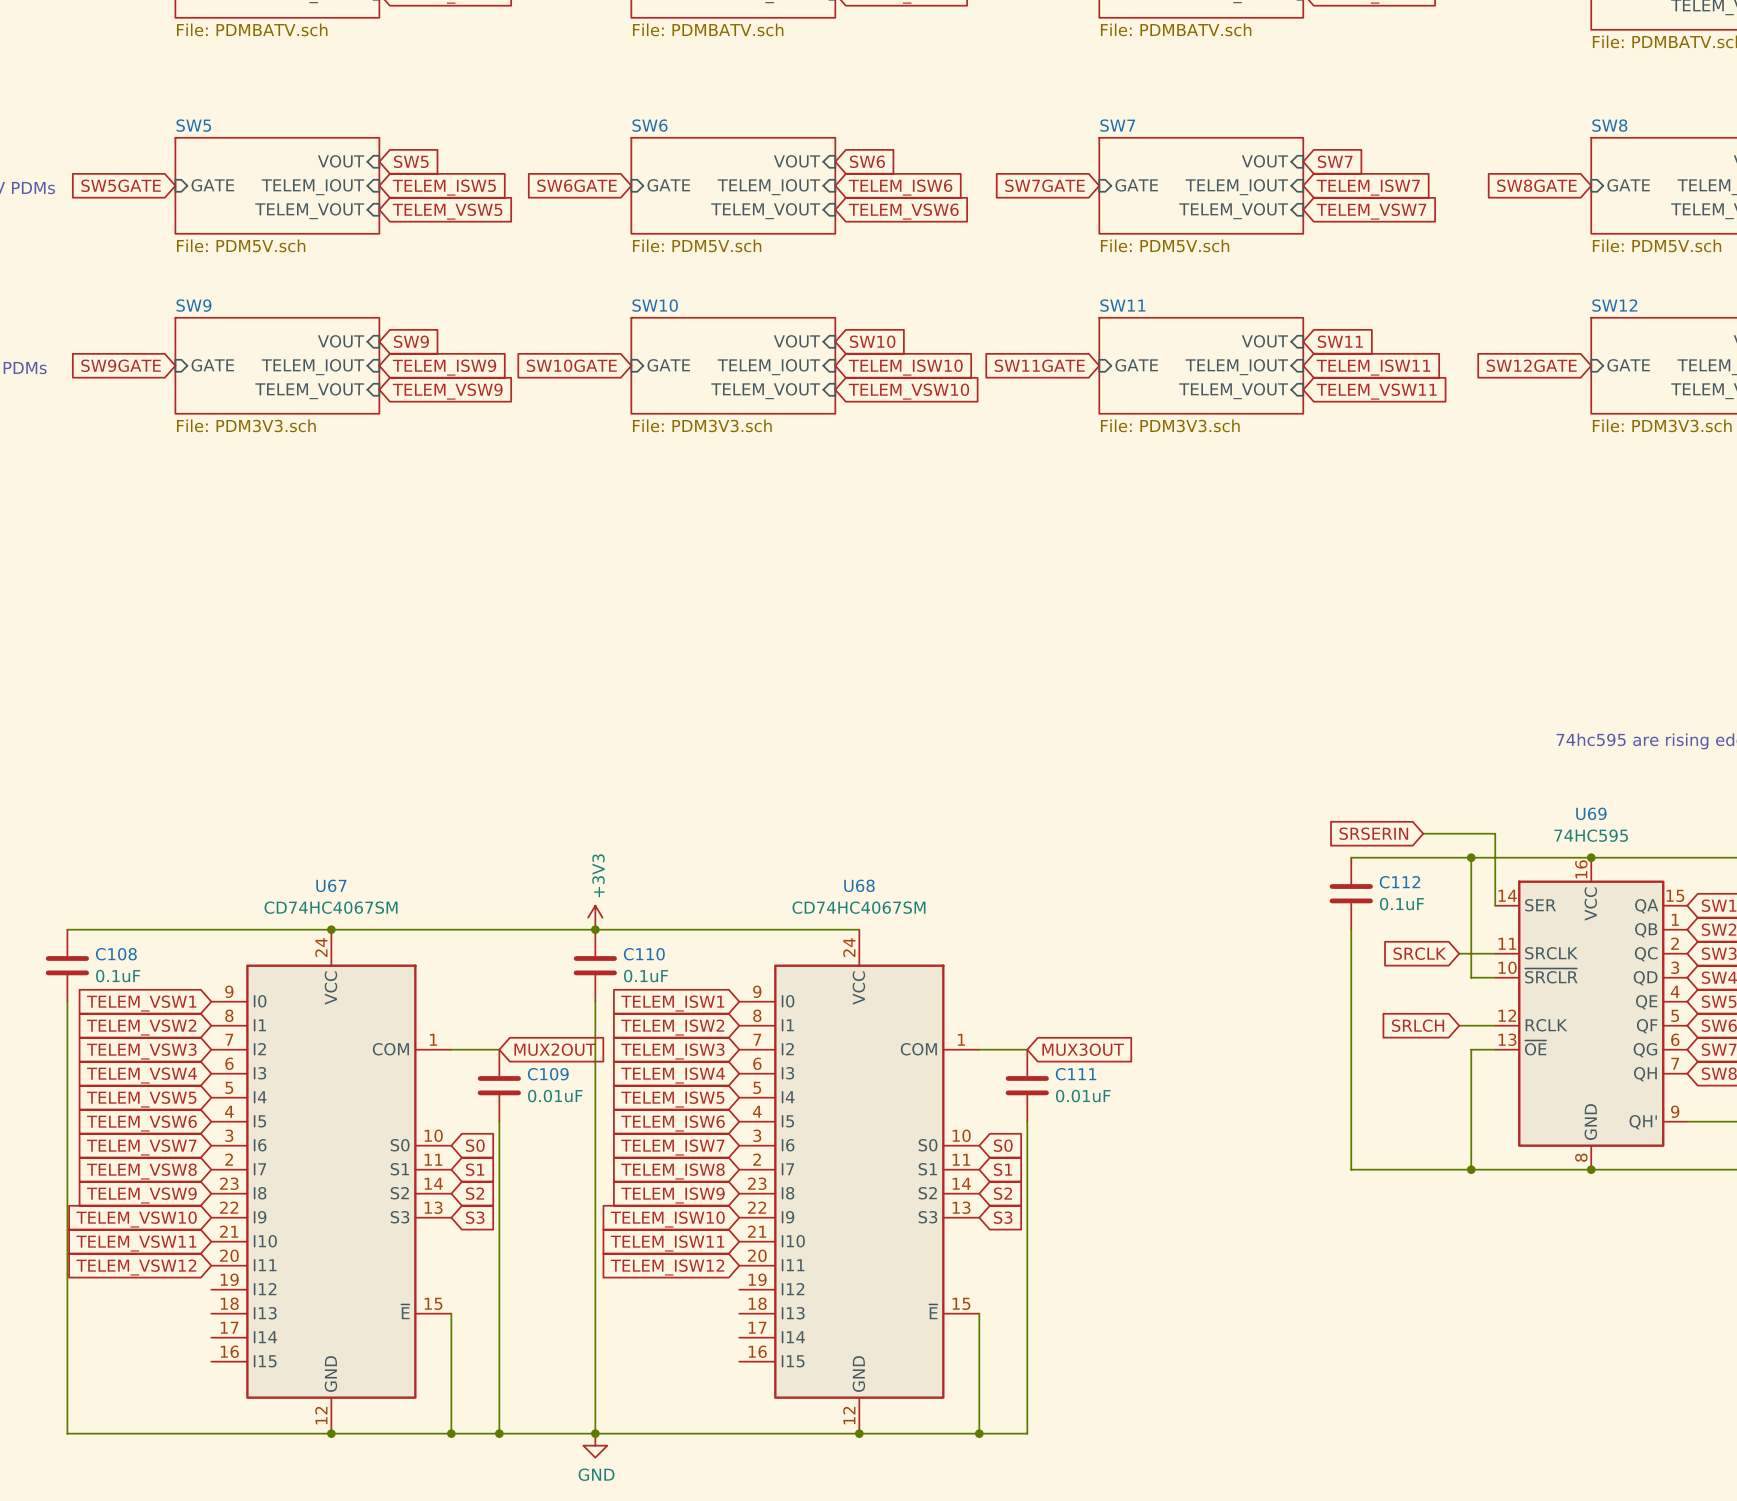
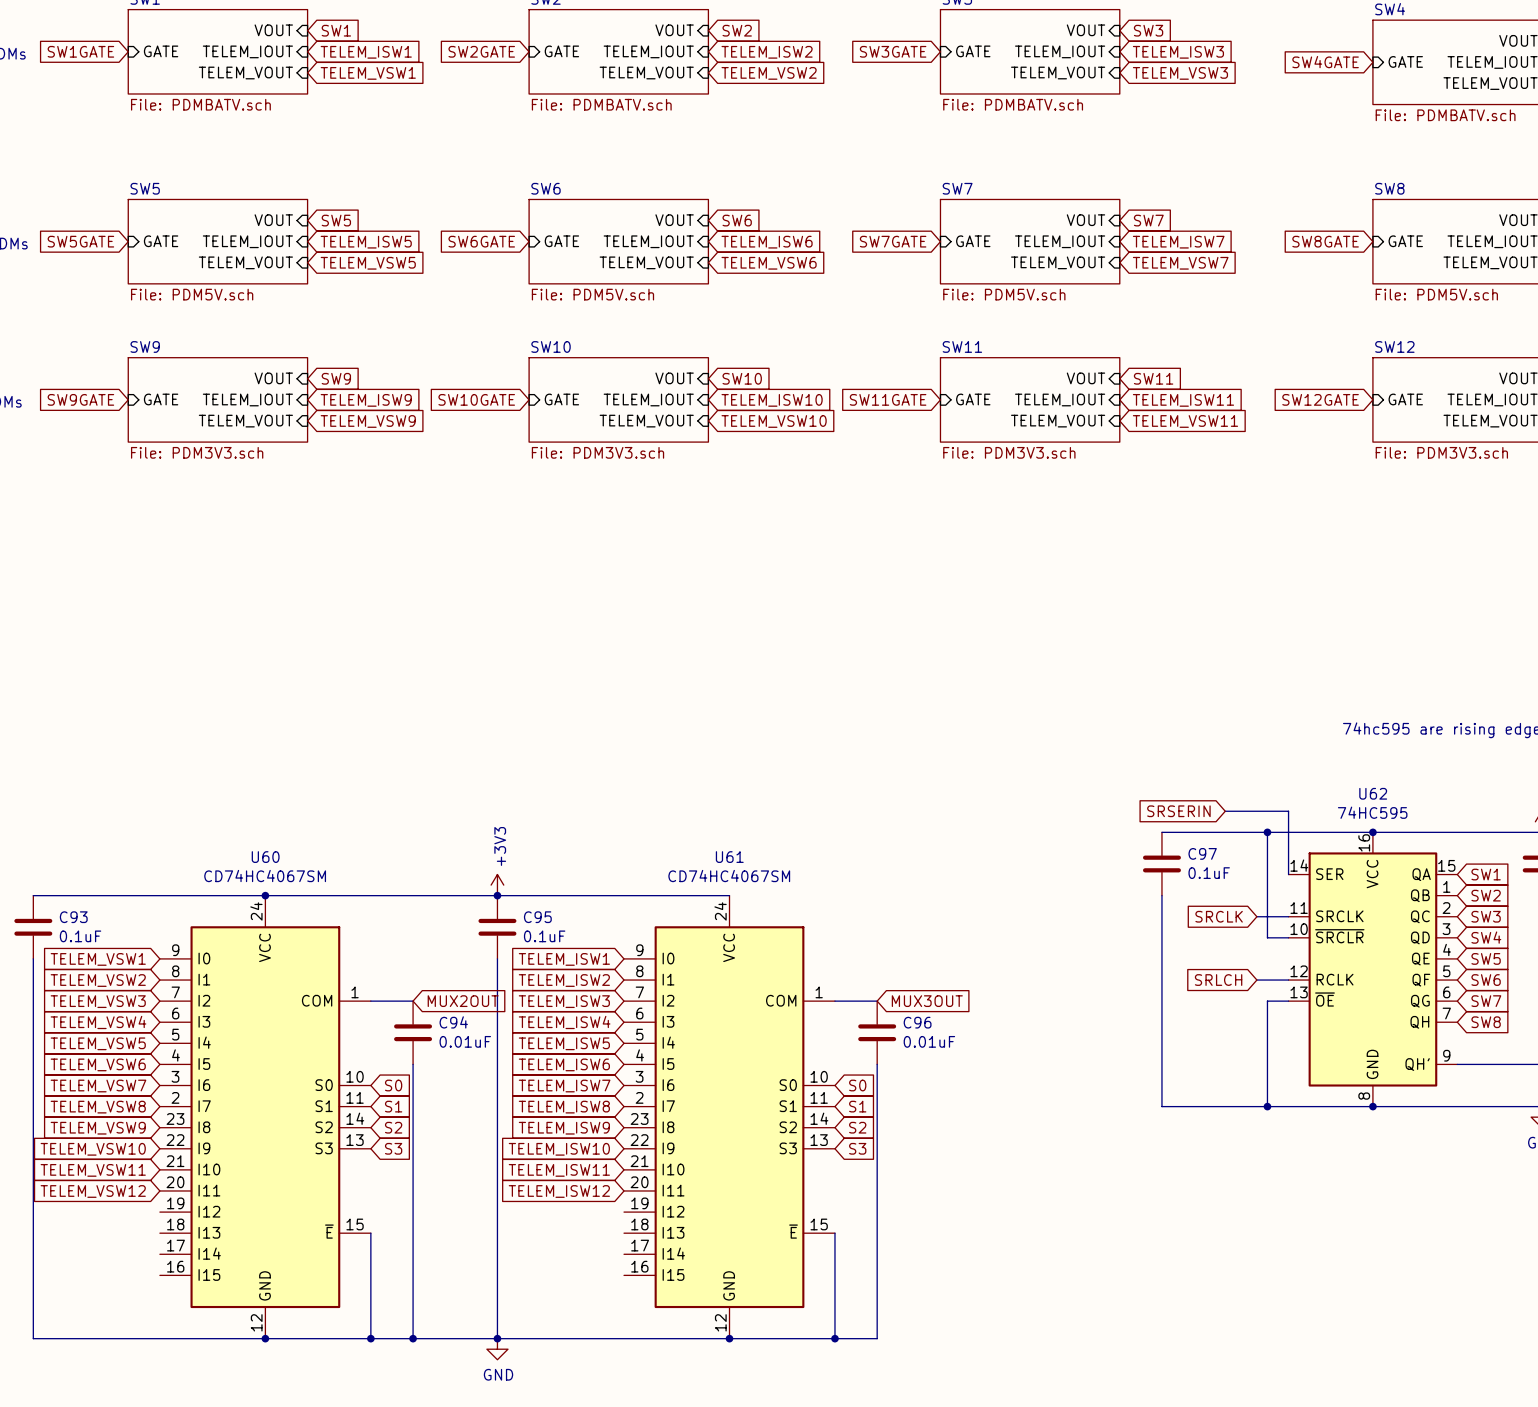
U69 name: U69 (1591, 813) -> U62 (1373, 793)
C112 name: C112 (1399, 882) -> C97 (1202, 853)
U67 name: U67 (331, 885) -> U60 (265, 857)
U68 name: U68 (859, 885) -> U61 (729, 857)
C108 name: C108 (116, 954) -> C93 (73, 917)
C110 name: C110 (644, 954) -> C95 (537, 917)
C109 name: C109 (548, 1074) -> C94 (453, 1022)
C111 name: C111 (1076, 1074) -> C96 (917, 1022)

